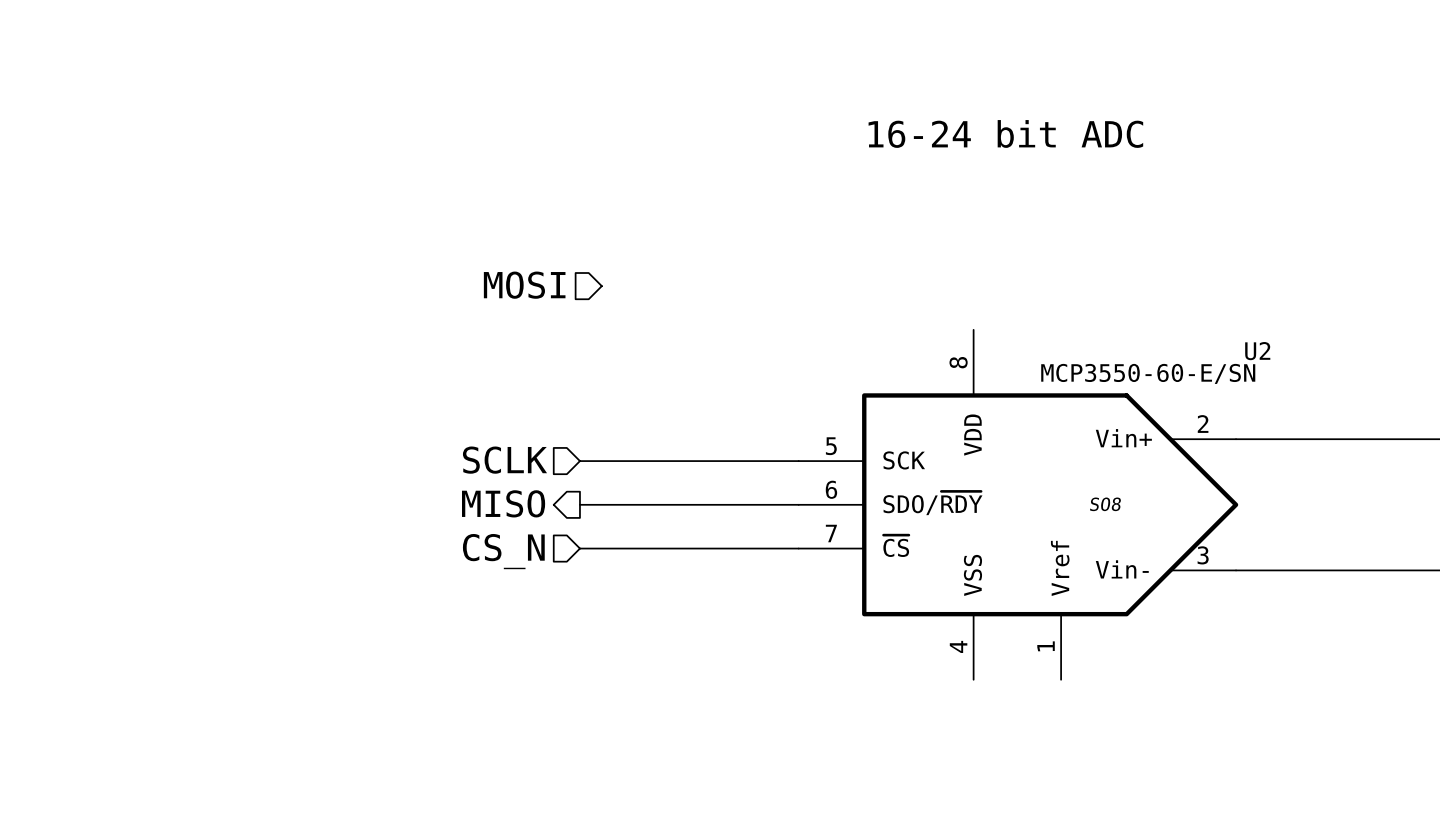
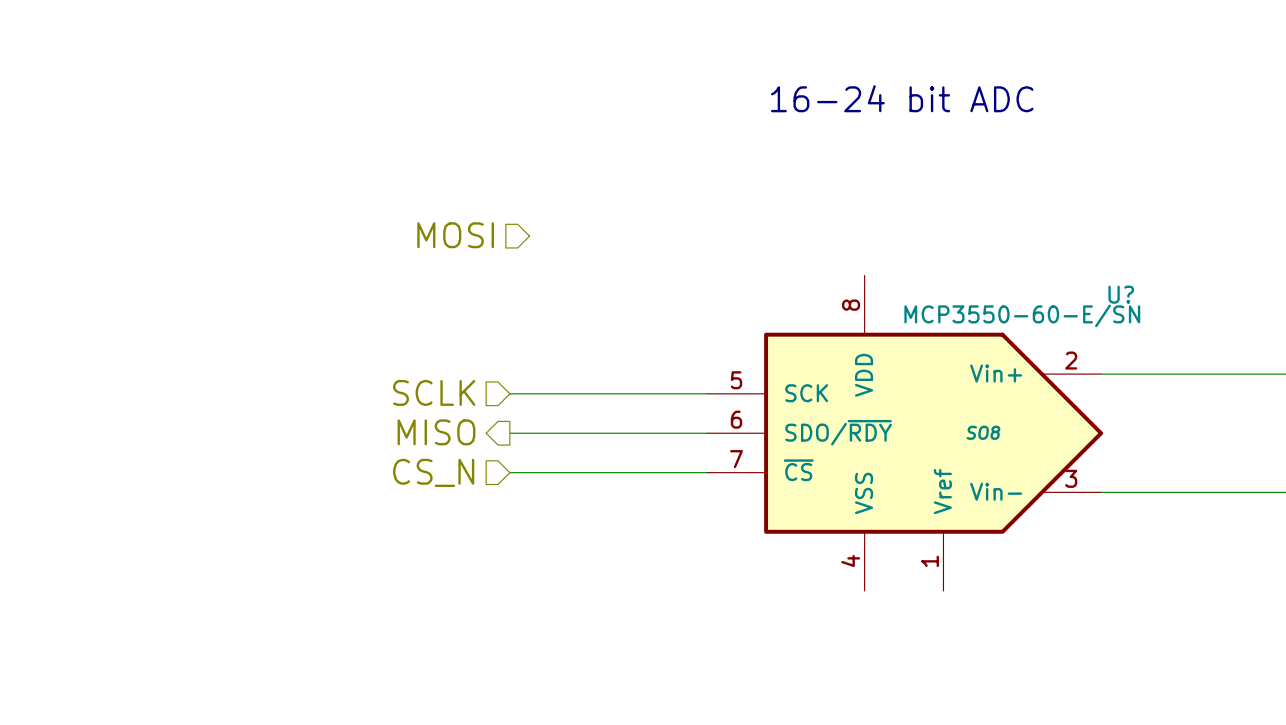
U2 name: U2 (1257, 351) -> U? (1121, 294)

